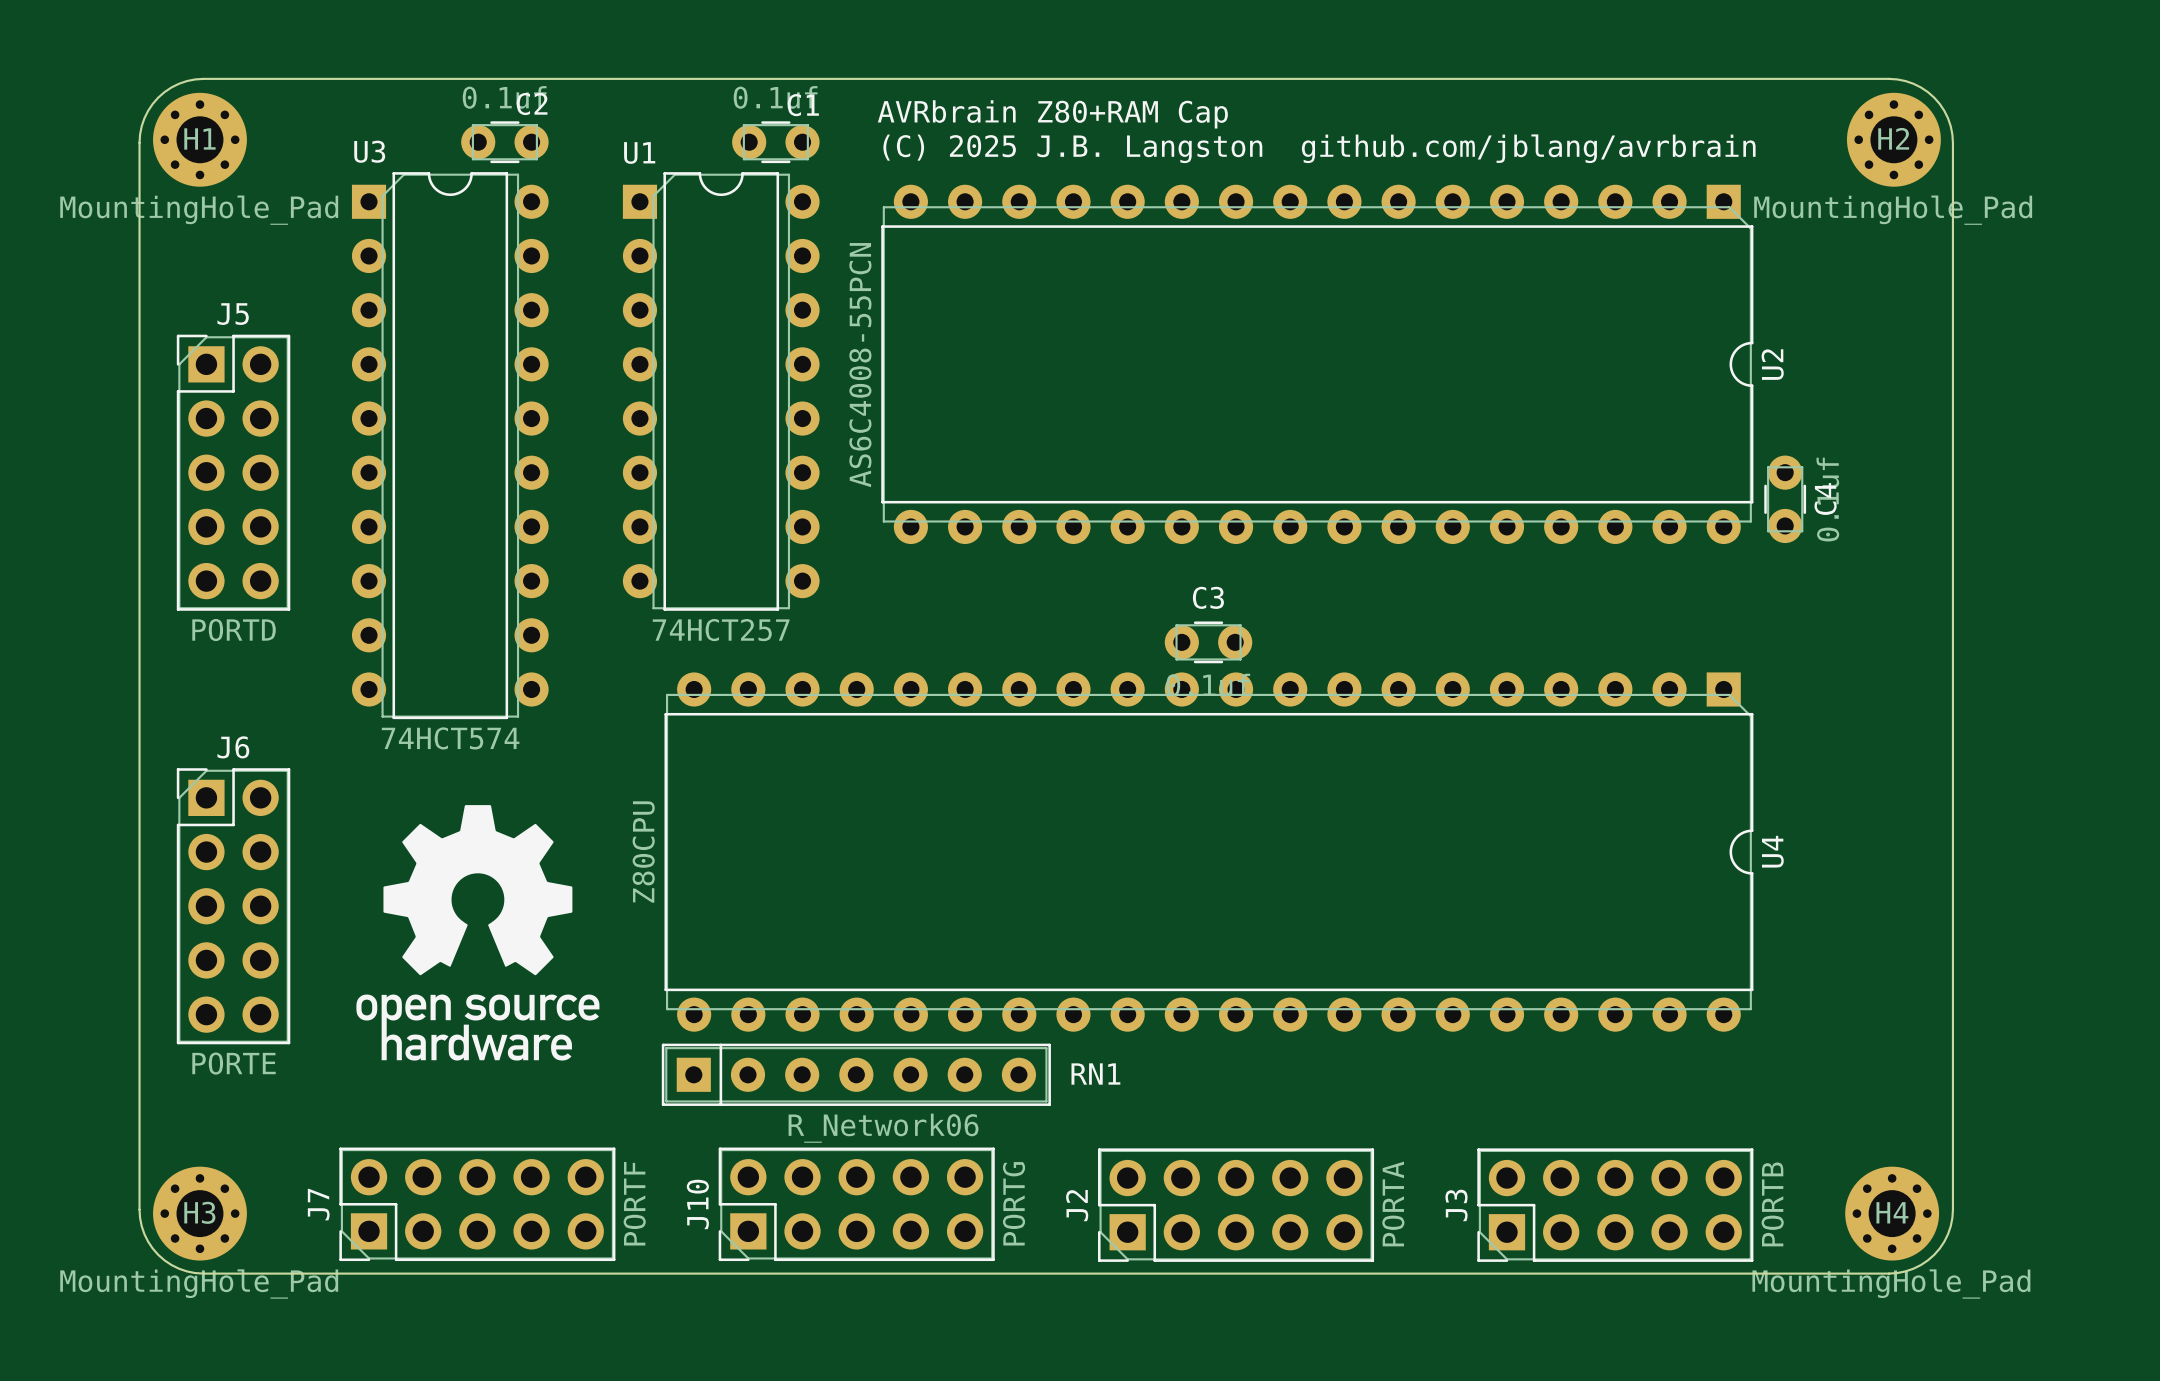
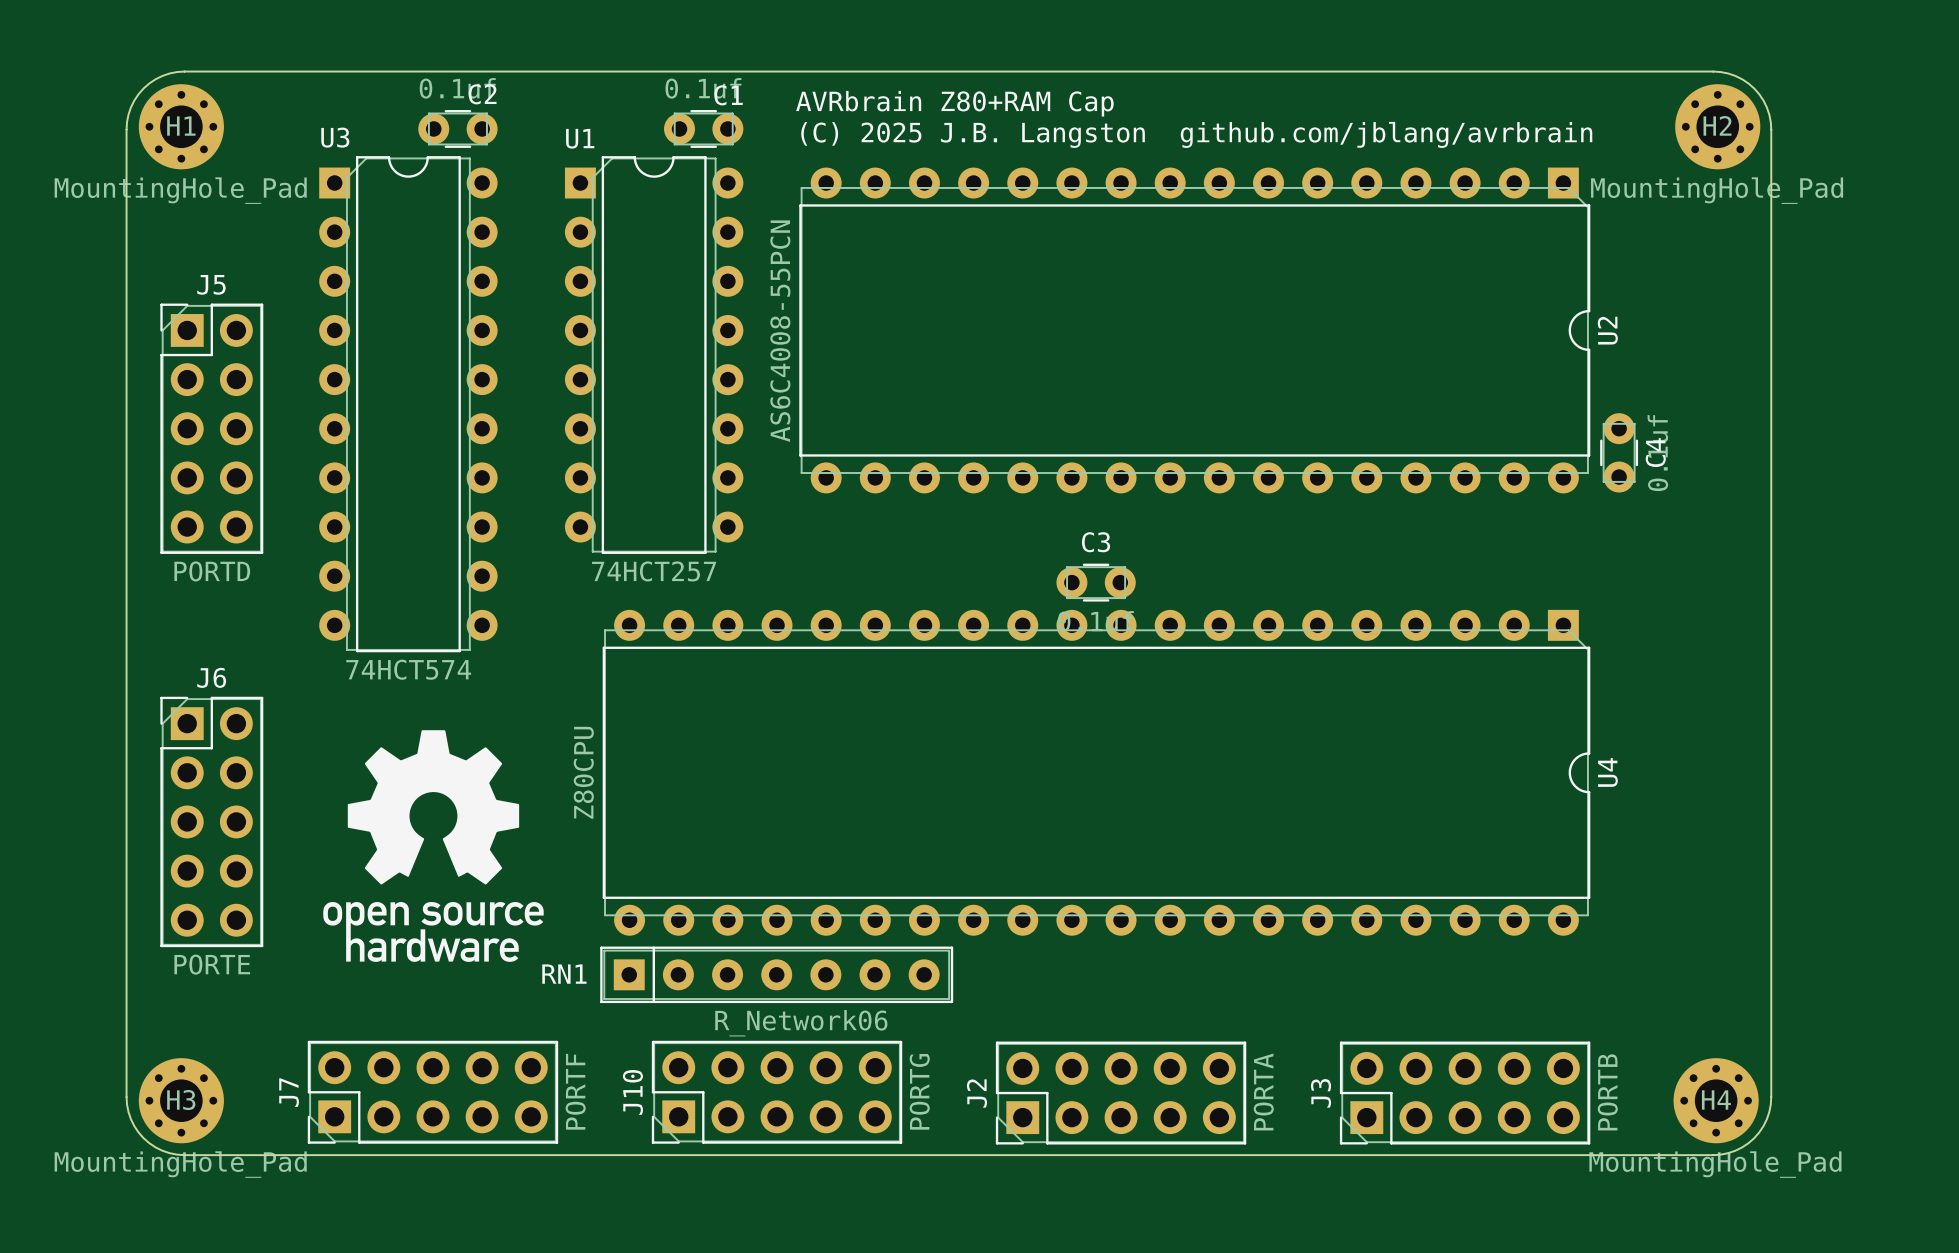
RN1 name position: RN1 (1095, 1074) -> RN1 (564, 974)

